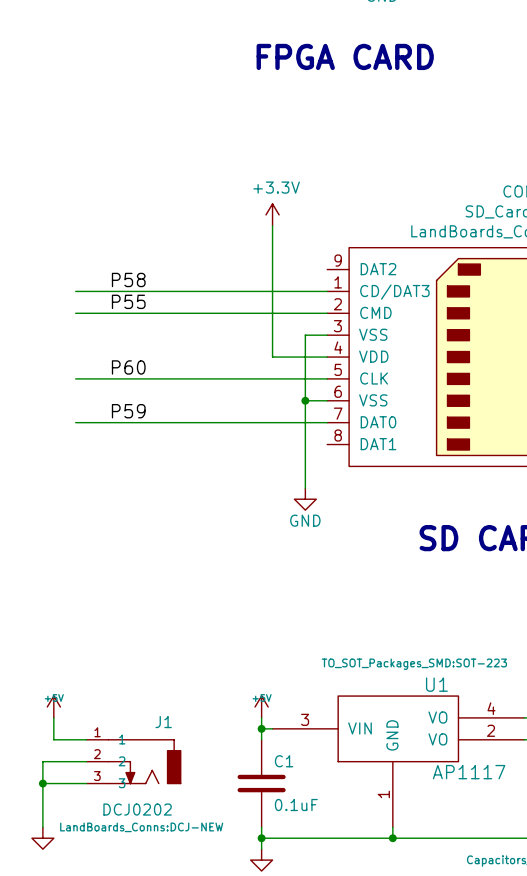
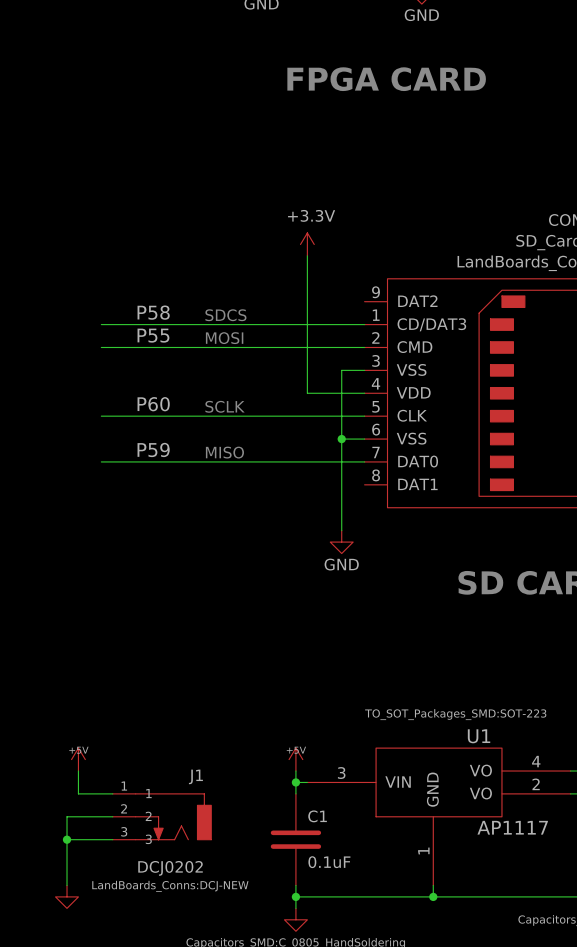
text: none -> SDCS (225, 315)
text: none -> MOSI (224, 338)
text: none -> SCLK (225, 406)
text: none -> MISO (224, 452)

